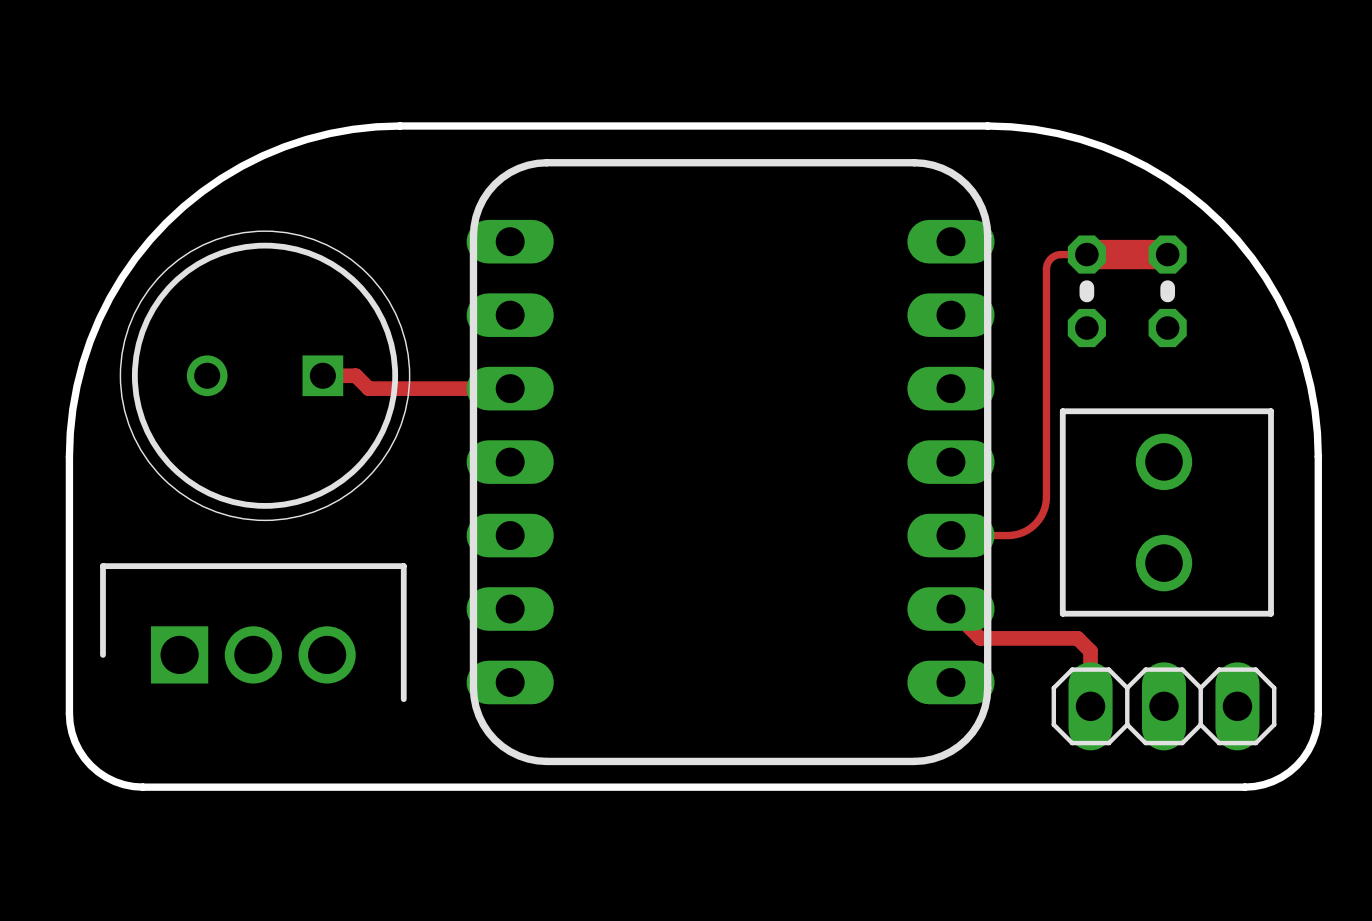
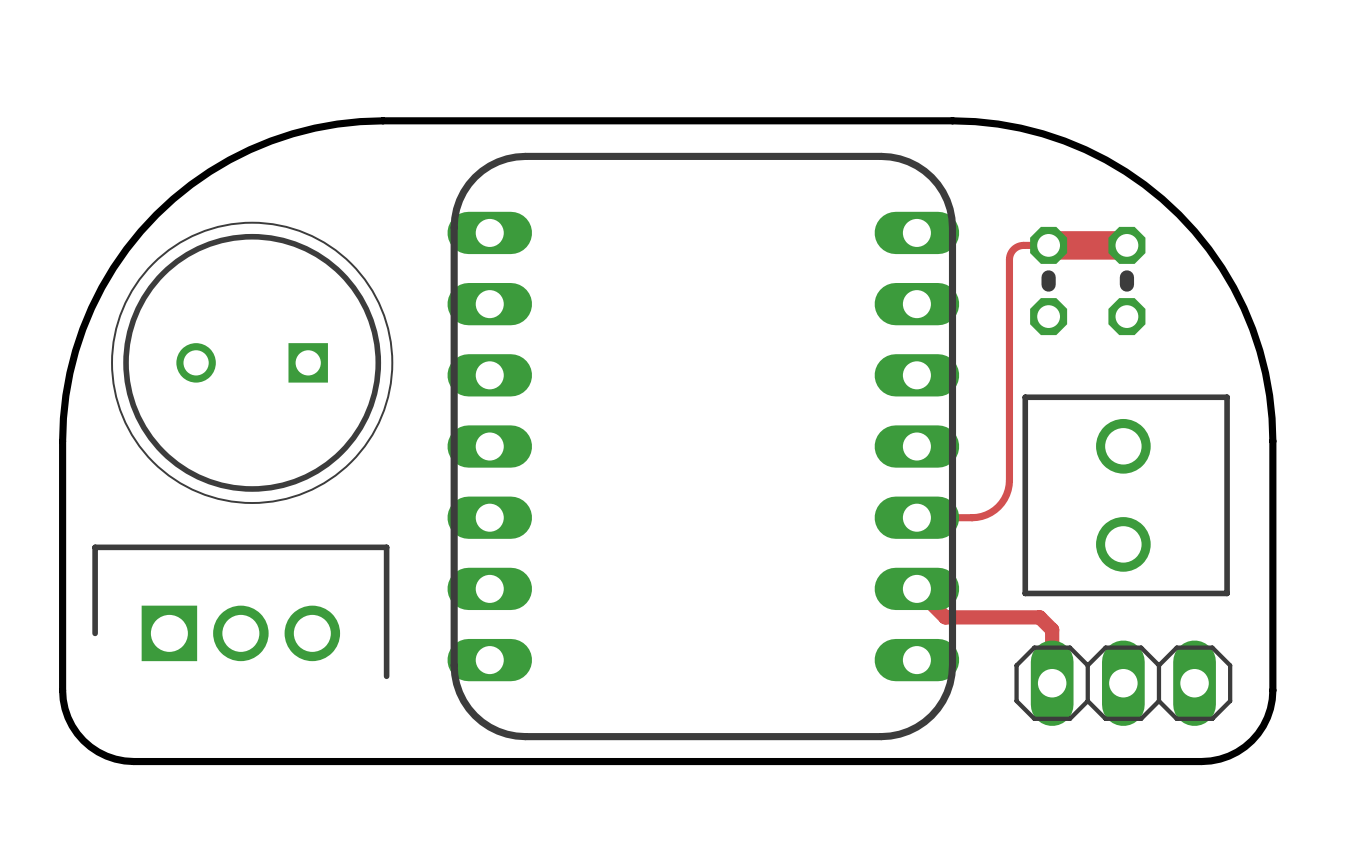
track: (322, 375) (355, 375) (368, 388) (510, 388) -> none

